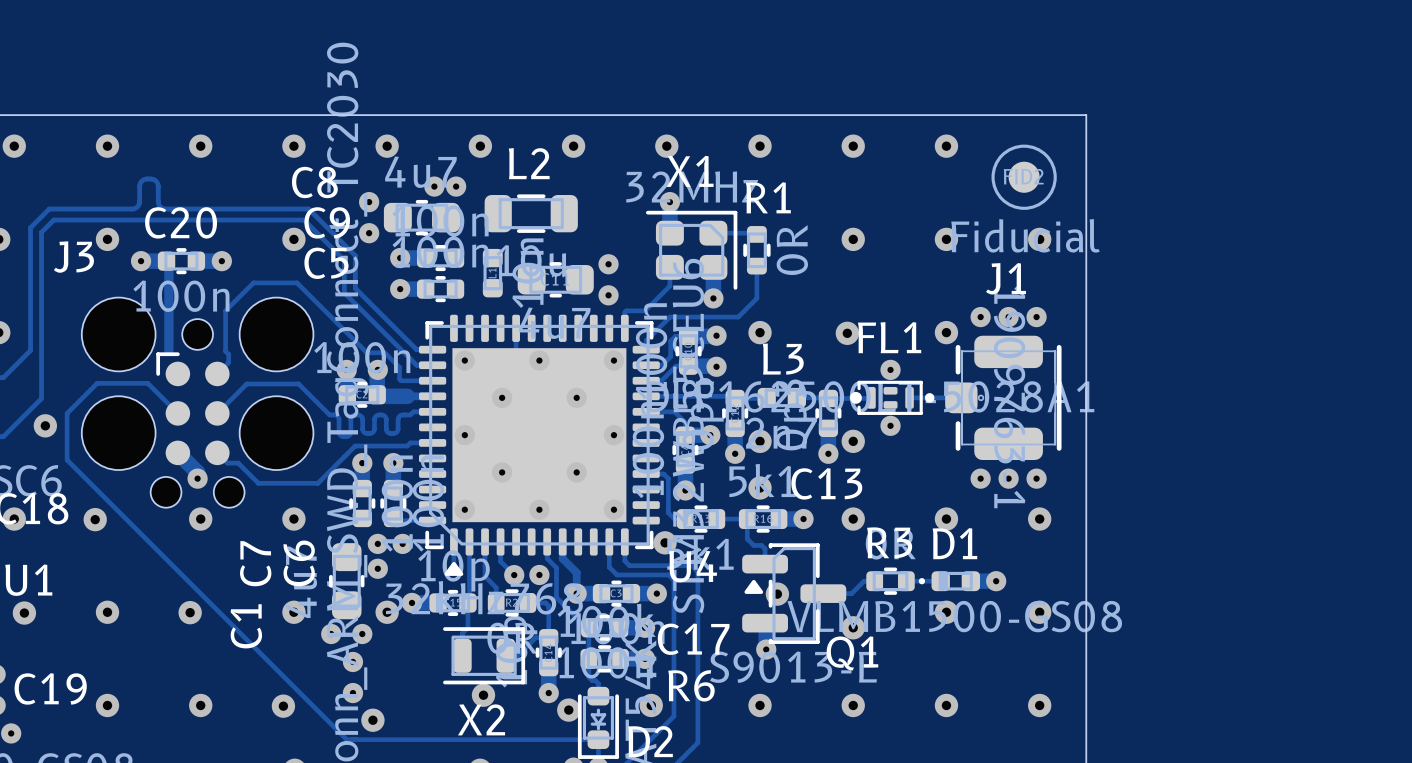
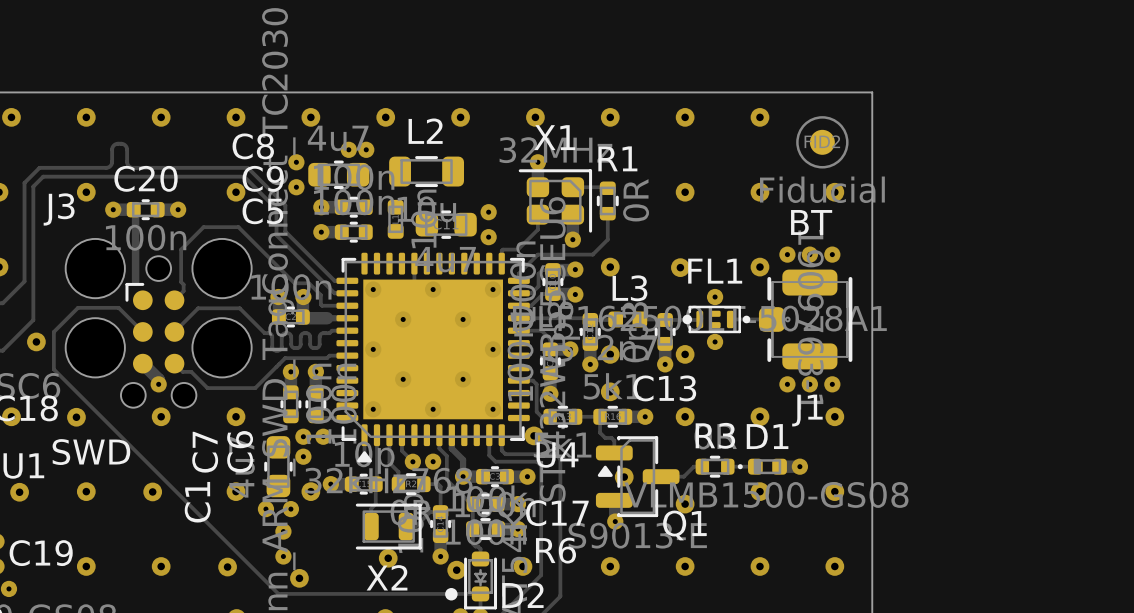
text: none -> BT (811, 222)
J1 name position: J1 (1006, 278) -> J1 (807, 410)
text: none -> SWD (91, 452)
D2 footprint: [577, 686, 619, 759] -> [445, 551, 498, 610]

